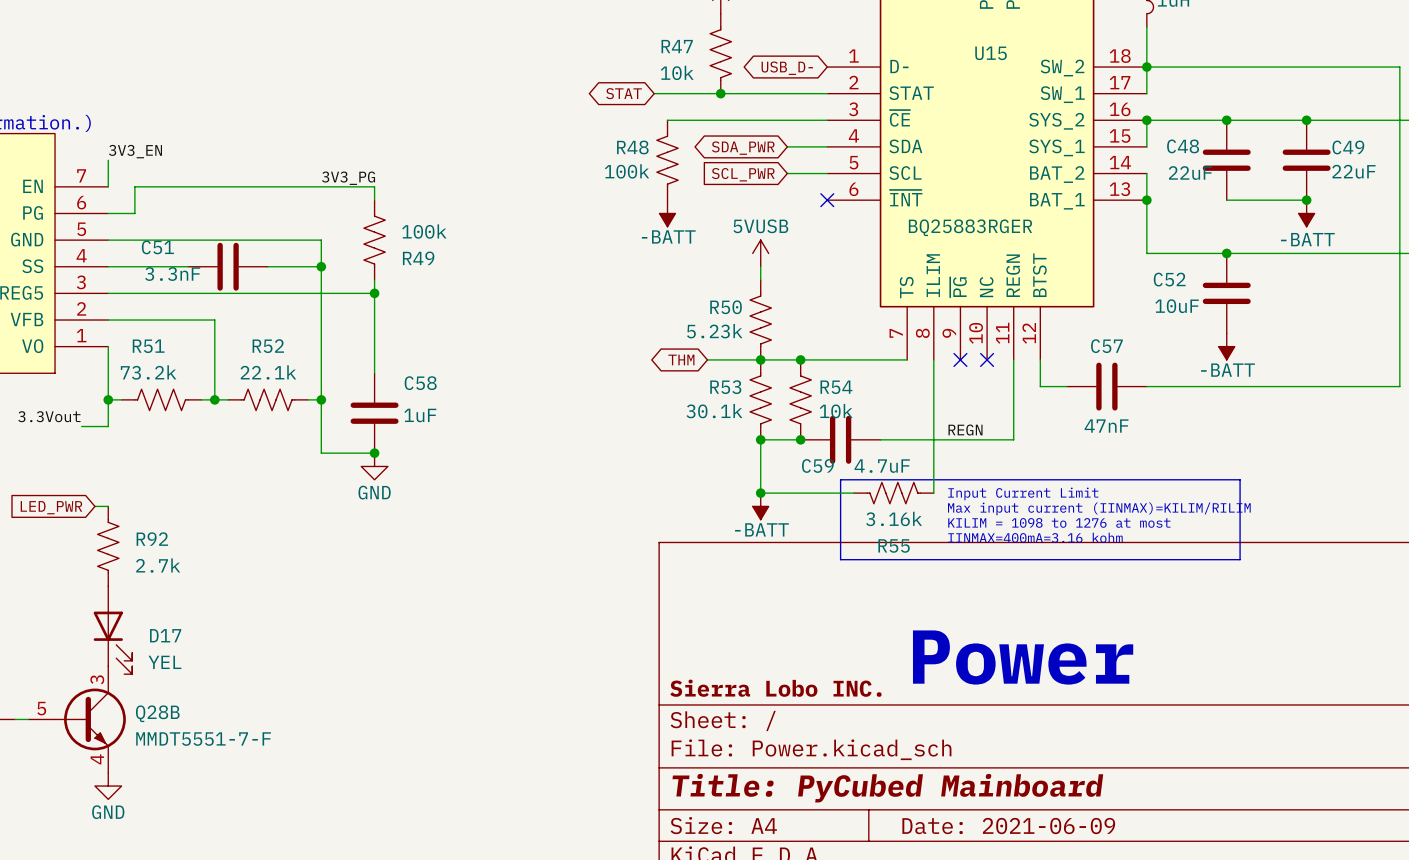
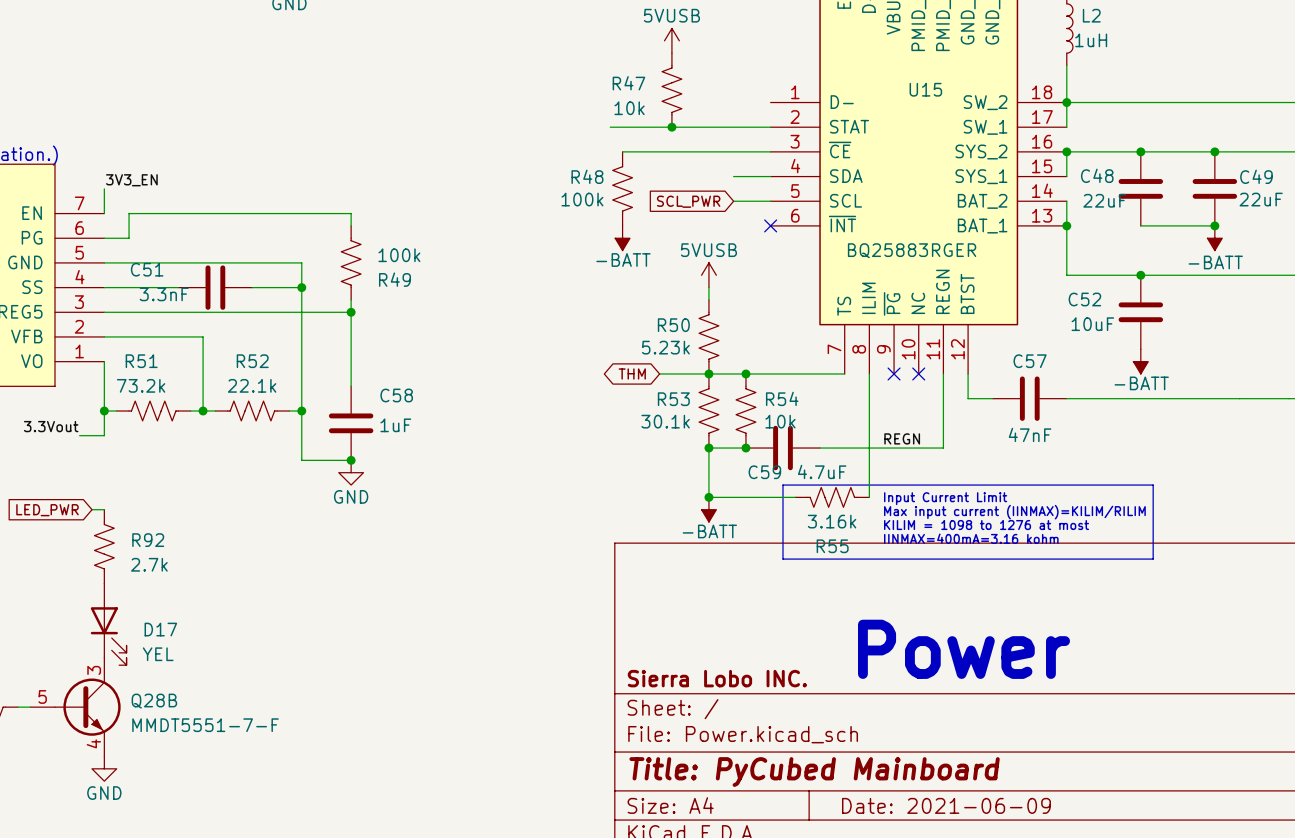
global label: USB_D- (787, 68) -> none
global label: STAT (624, 93) -> none
global label: SDA_PWR (743, 148) -> none
label: 3V3_PG (348, 178) -> none

